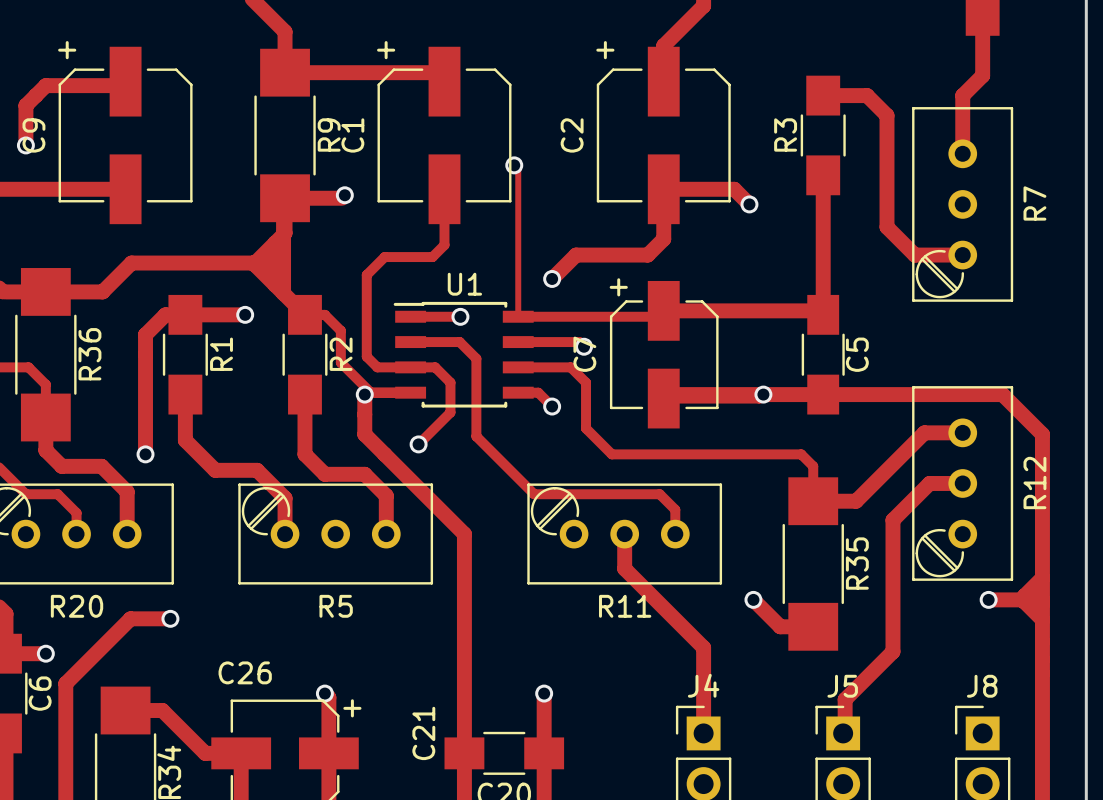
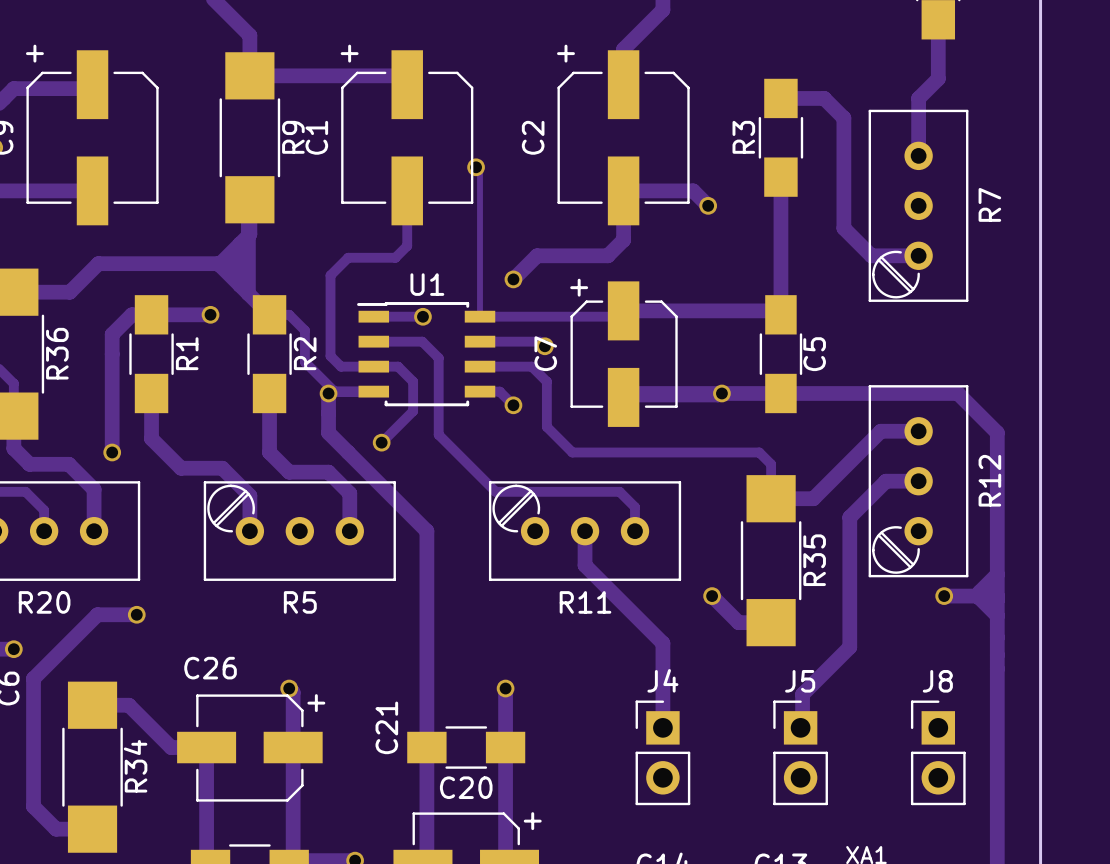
track: (344, 195) (341, 198) (285, 198) -> none
via: (344, 195) -> none

